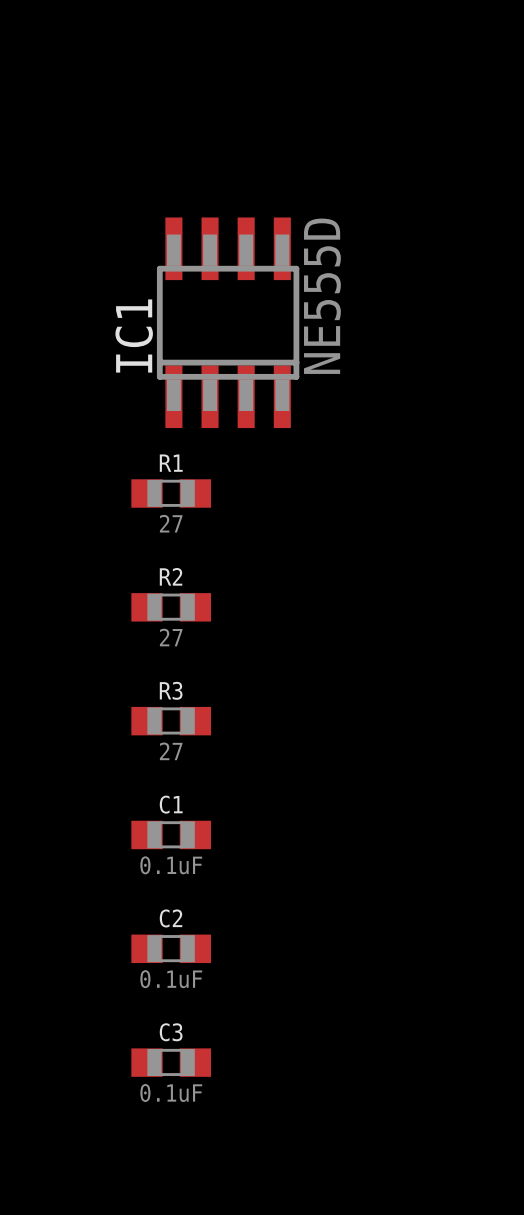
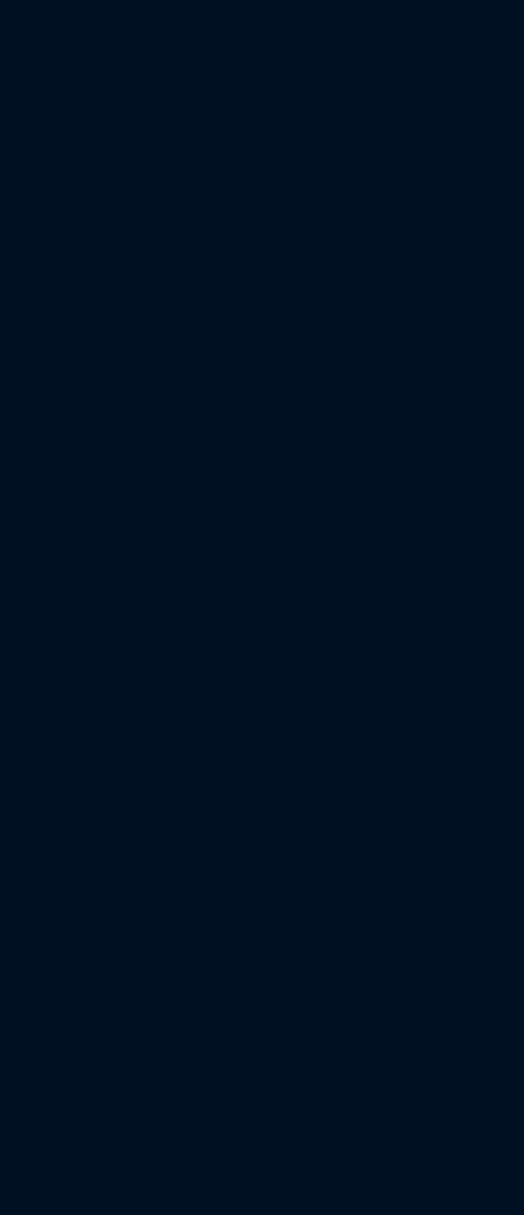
IC1: NE555D (228, 322) -> none
R1: 27 (171, 493) -> none
R2: 27 (171, 607) -> none
R3: 27 (171, 721) -> none
C1: 0.1uF (171, 834) -> none
C2: 0.1uF (171, 948) -> none
C3: 0.1uF (171, 1062) -> none

